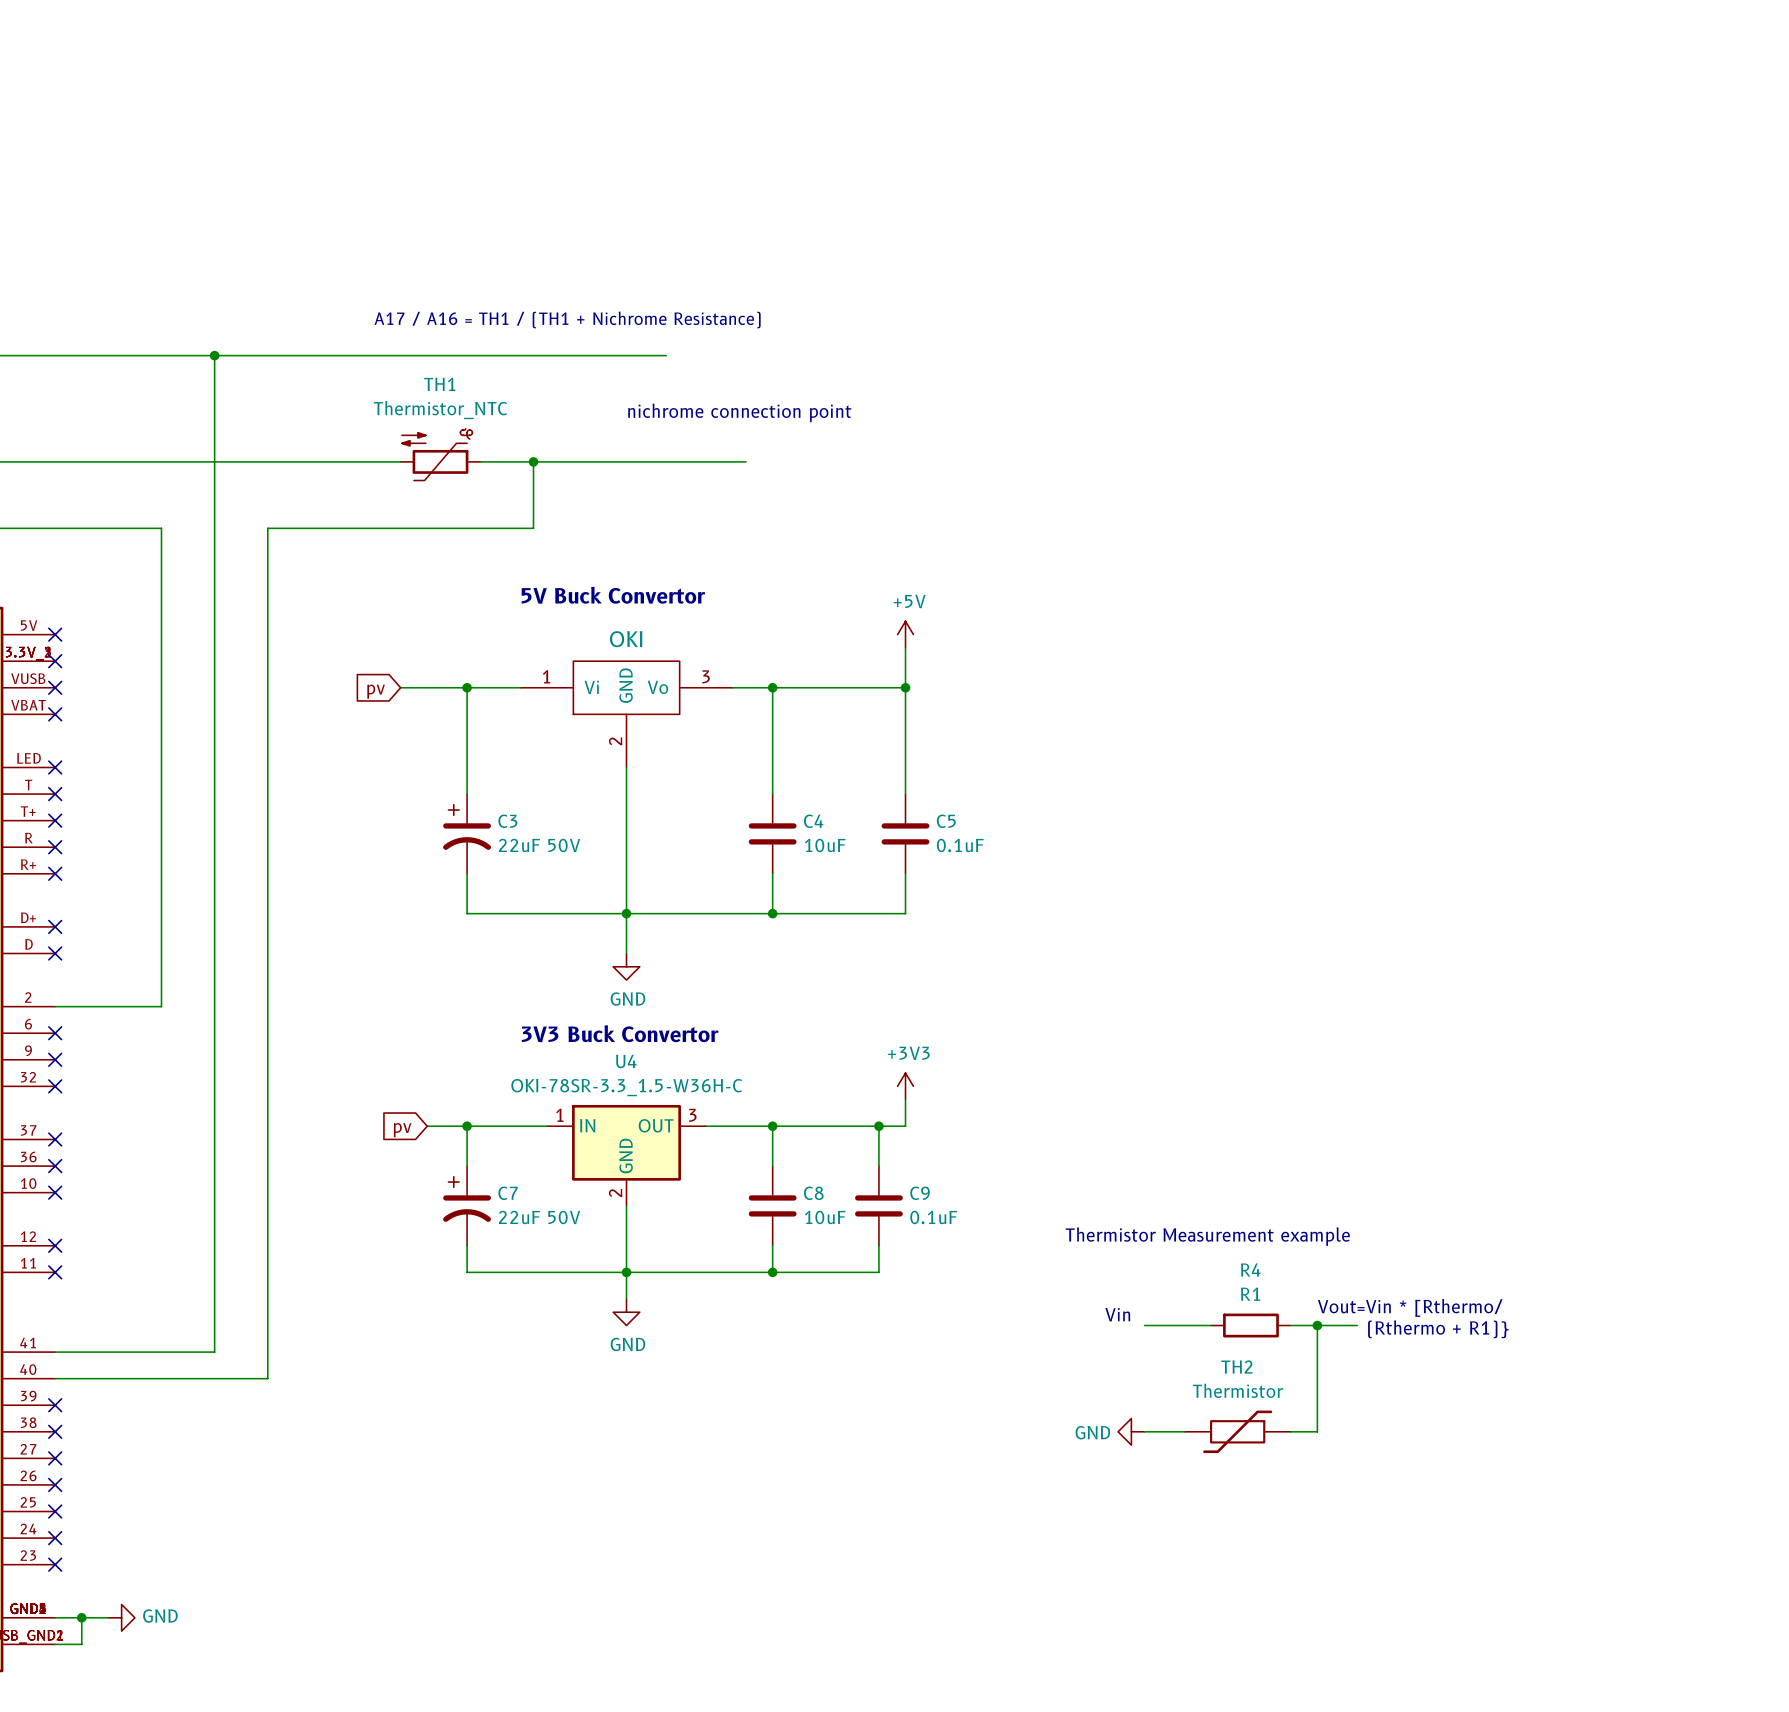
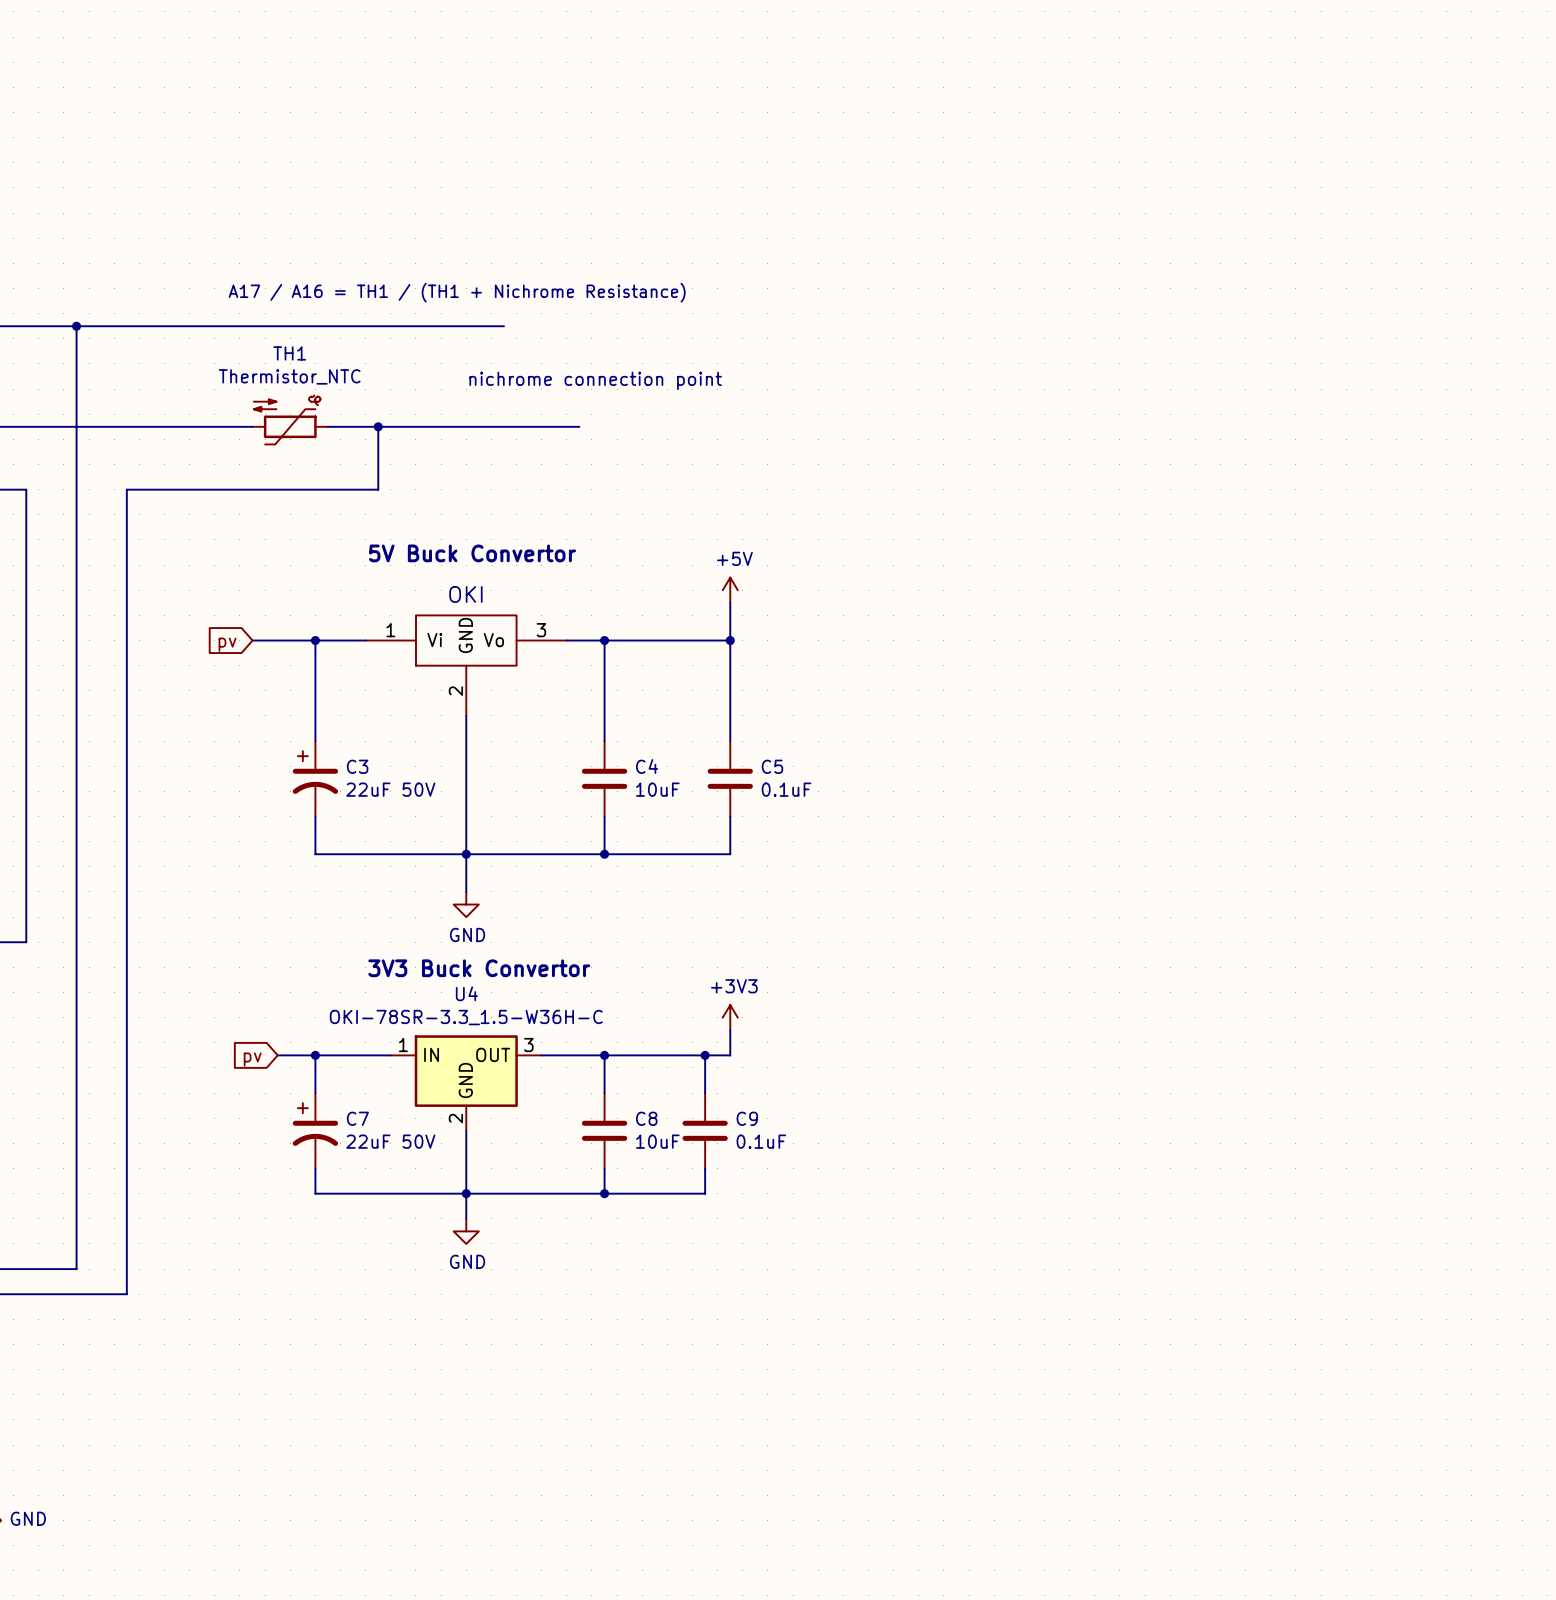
text: Thermistor Measurement example (1207, 1236) -> none
text: Vout=Vin * [Rthermo/ (1410, 1307) -> none
text: Vin (1117, 1314) -> none
wire: (1144, 1325) (1211, 1325) -> none
R4: R1 (1250, 1325) -> none
wire: (1290, 1325) (1357, 1325) -> none
wire: (1317, 1325) (1317, 1431) (1290, 1431) -> none
junction: (1317, 1325) -> none
text: (Rthermo + R1)} (1438, 1329) -> none
power symbol: GND (1131, 1431) -> none
wire: (1144, 1431) (1184, 1431) -> none
TH2: Thermistor (1237, 1431) -> none

